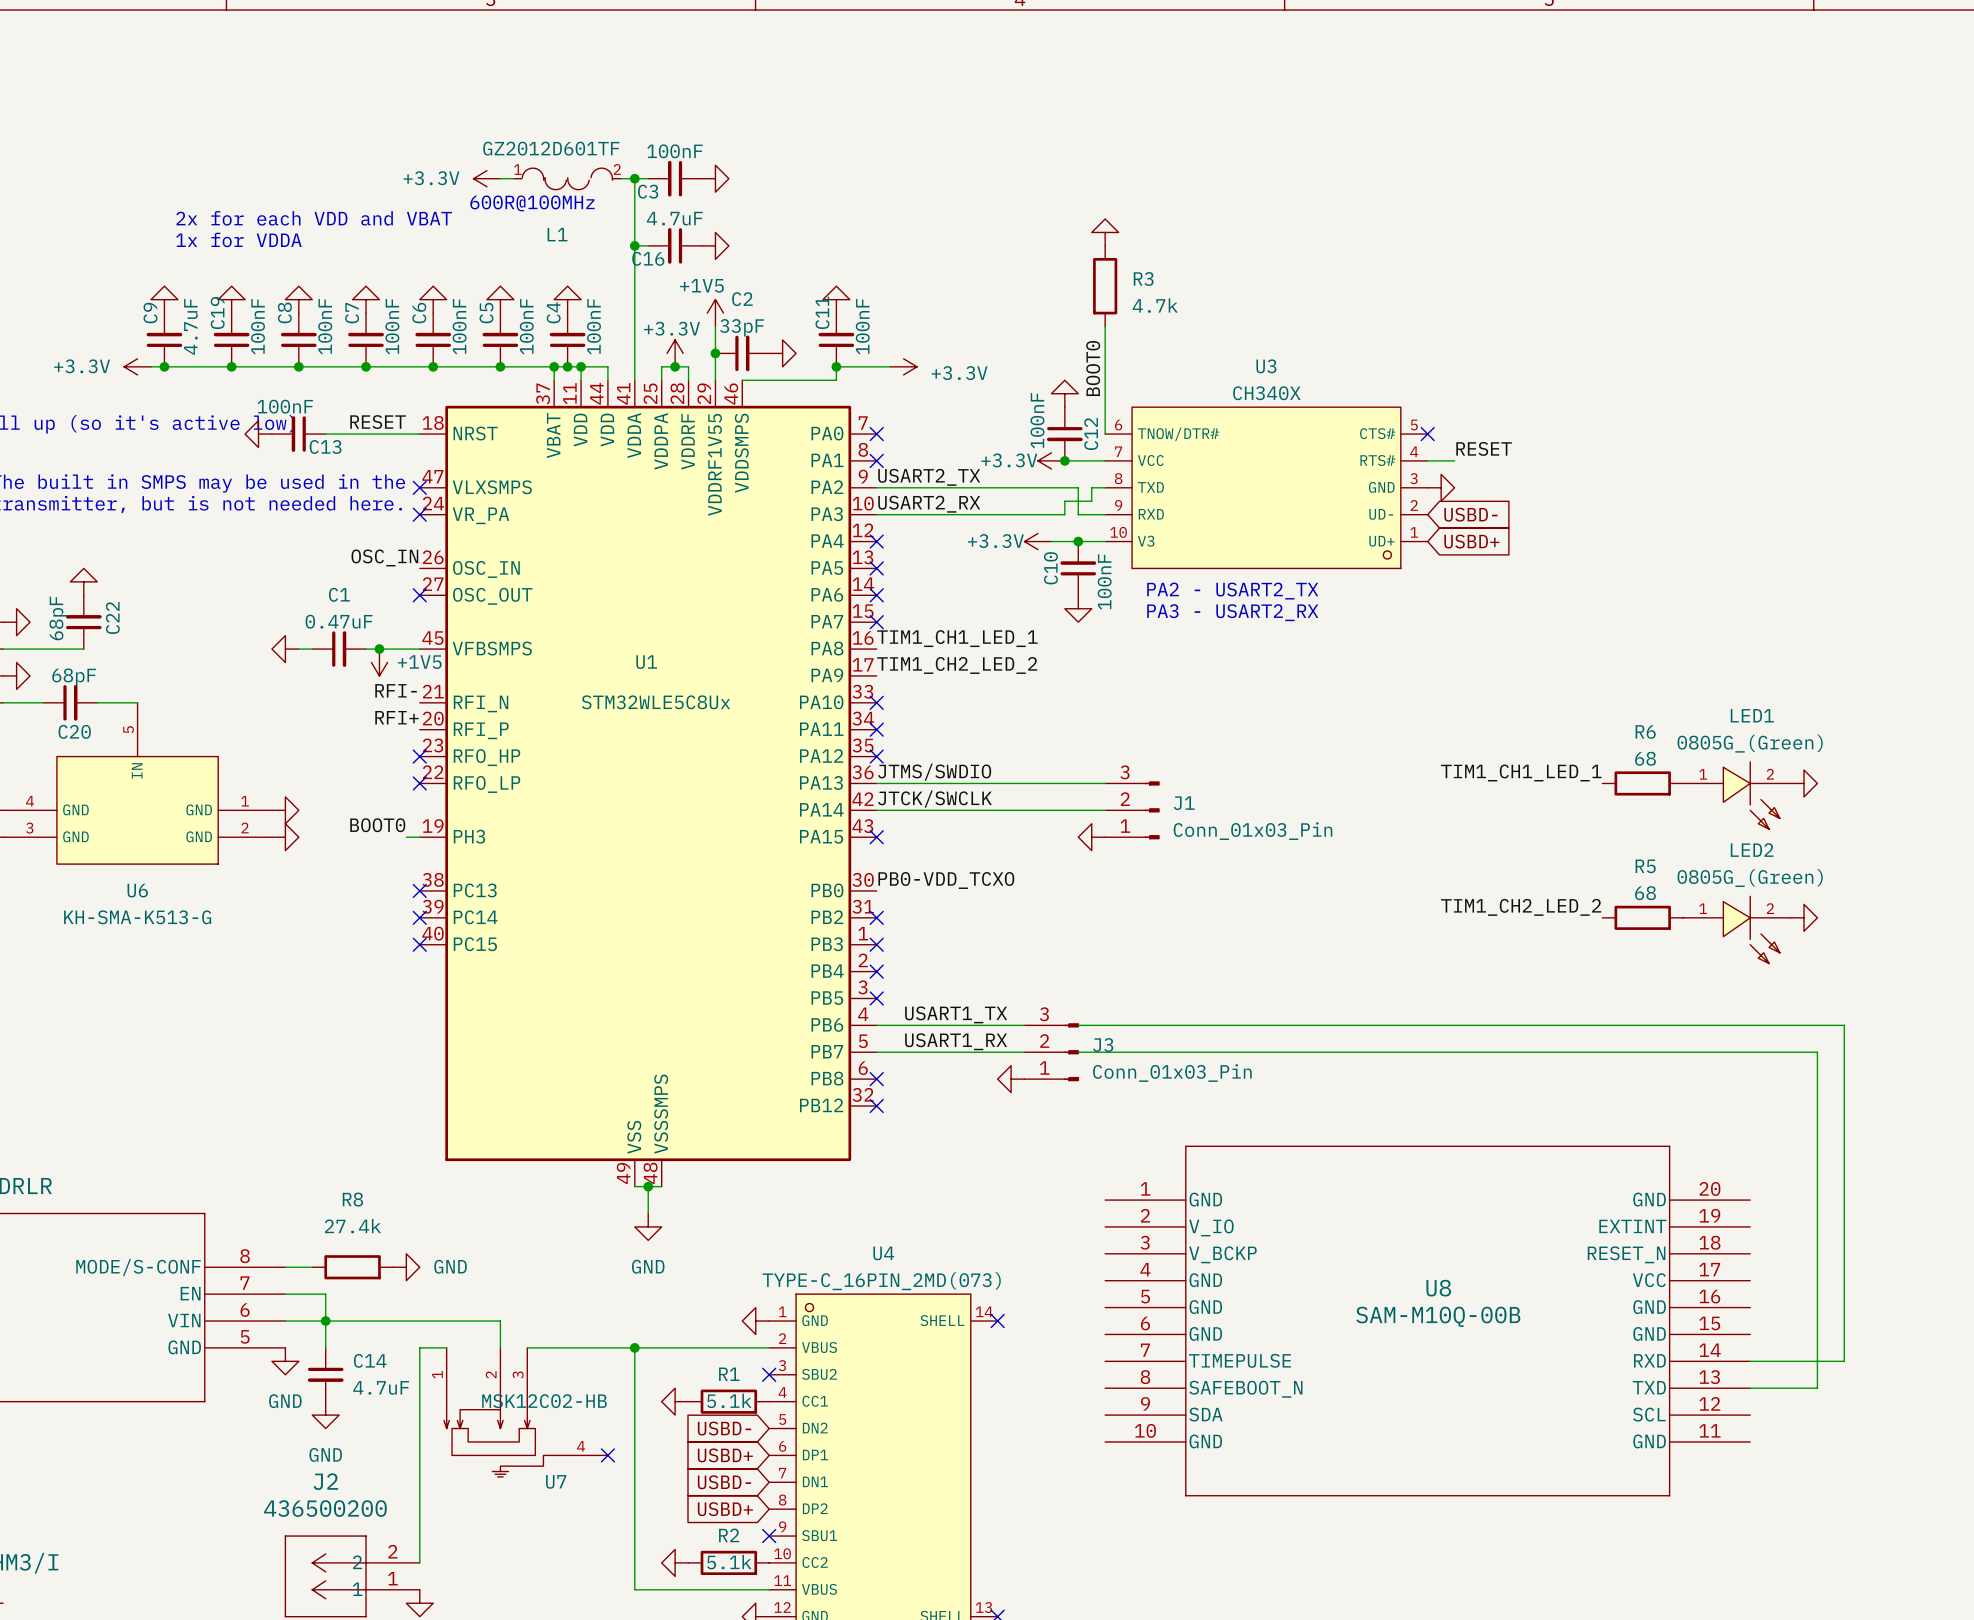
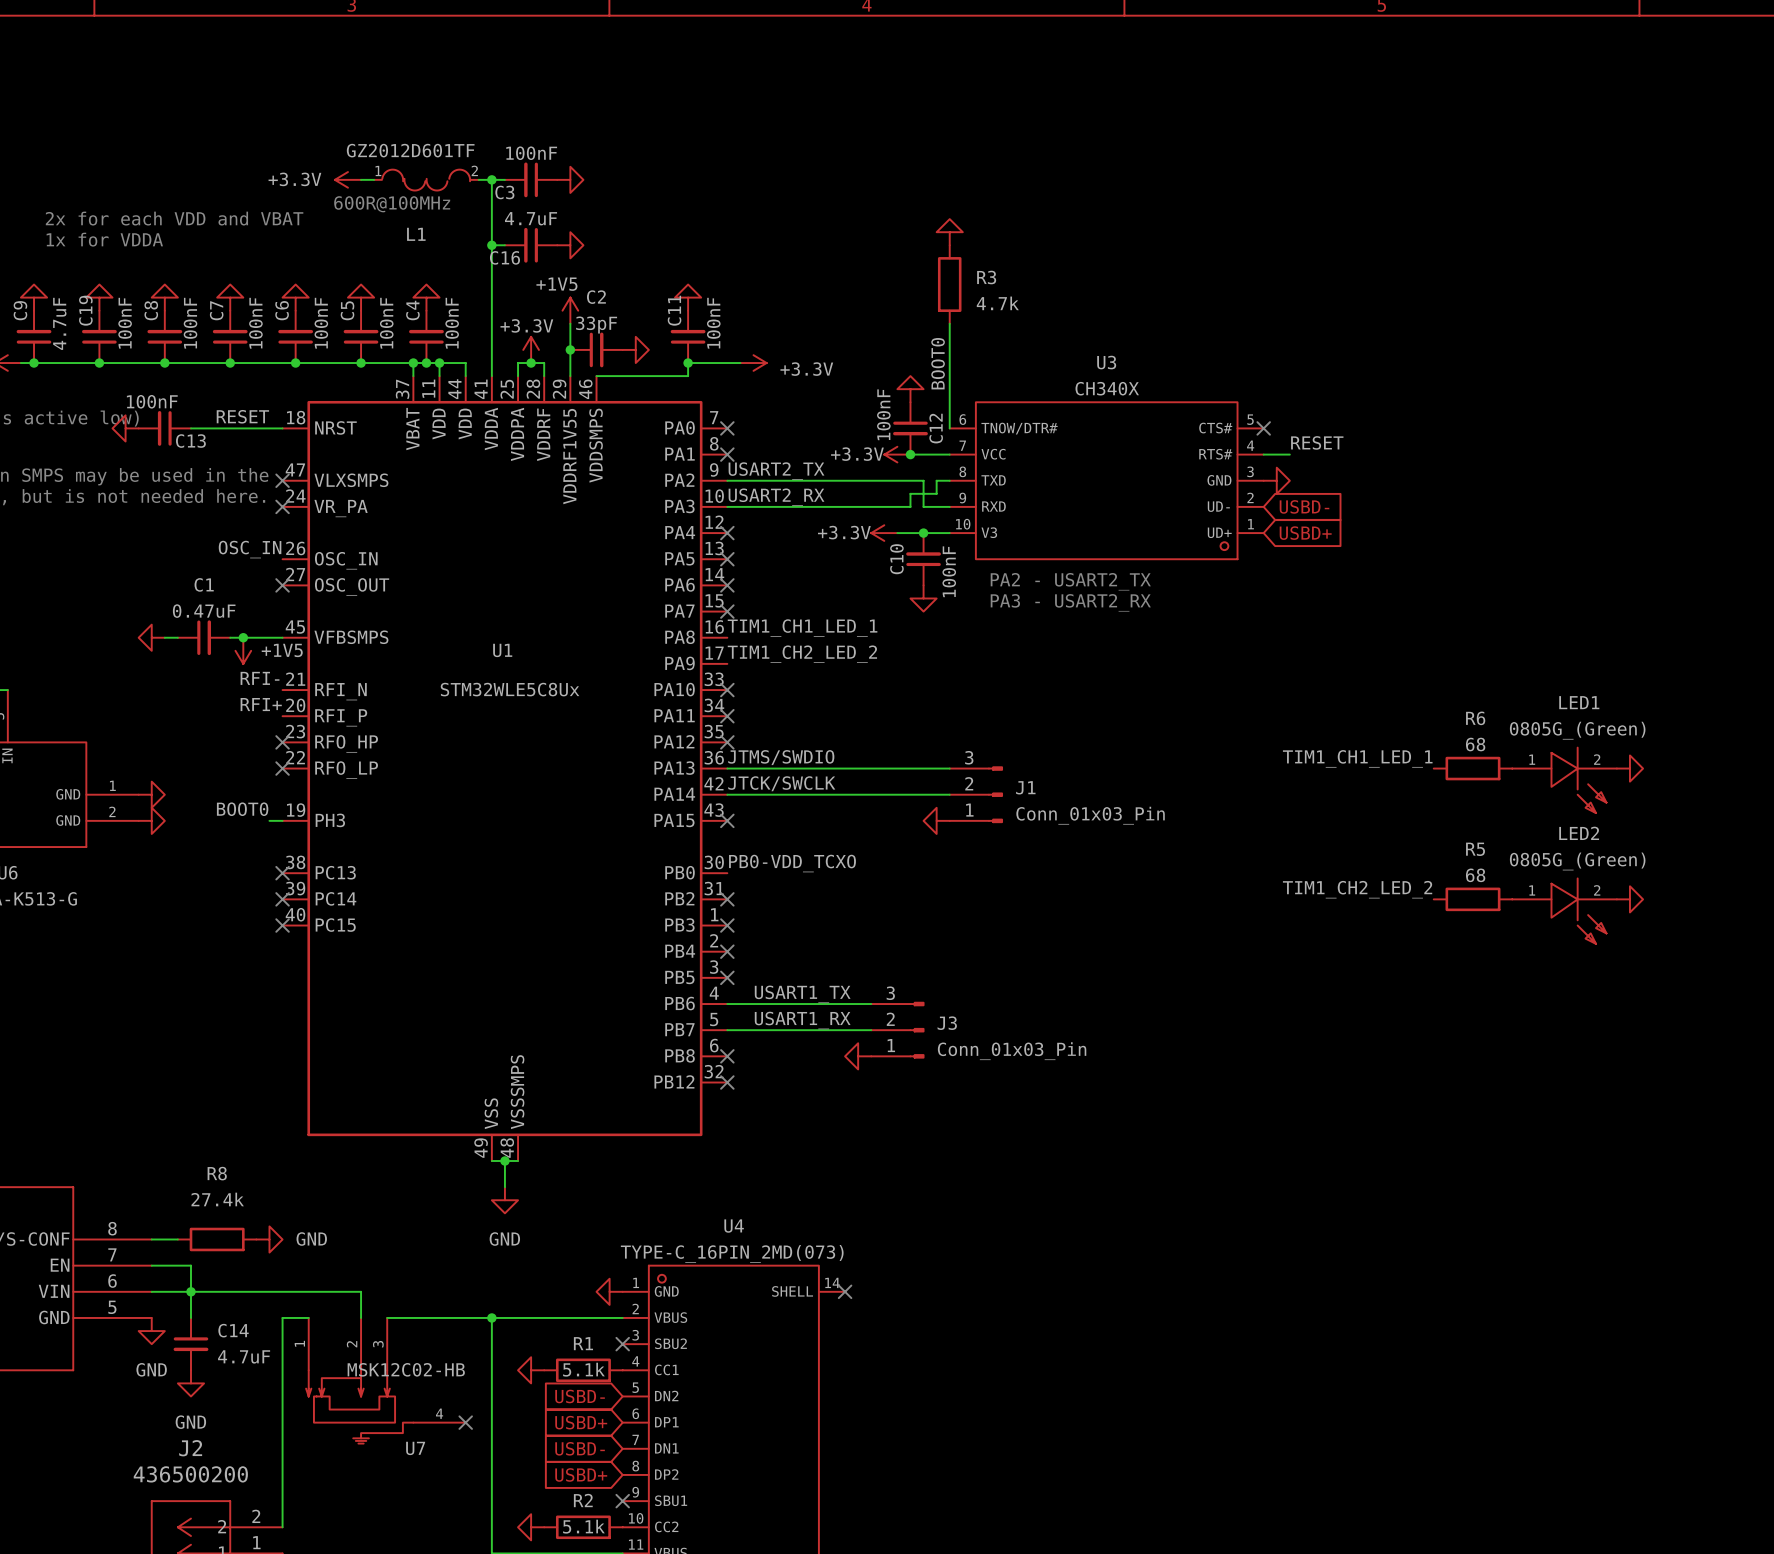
wire: (1078, 1025) (1844, 1025) (1844, 1361) (1750, 1361) -> none
wire: (1078, 1052) (1817, 1052) (1817, 1388) (1750, 1388) -> none
U8: SAM-M10Q-00B (1427, 1321) -> none

